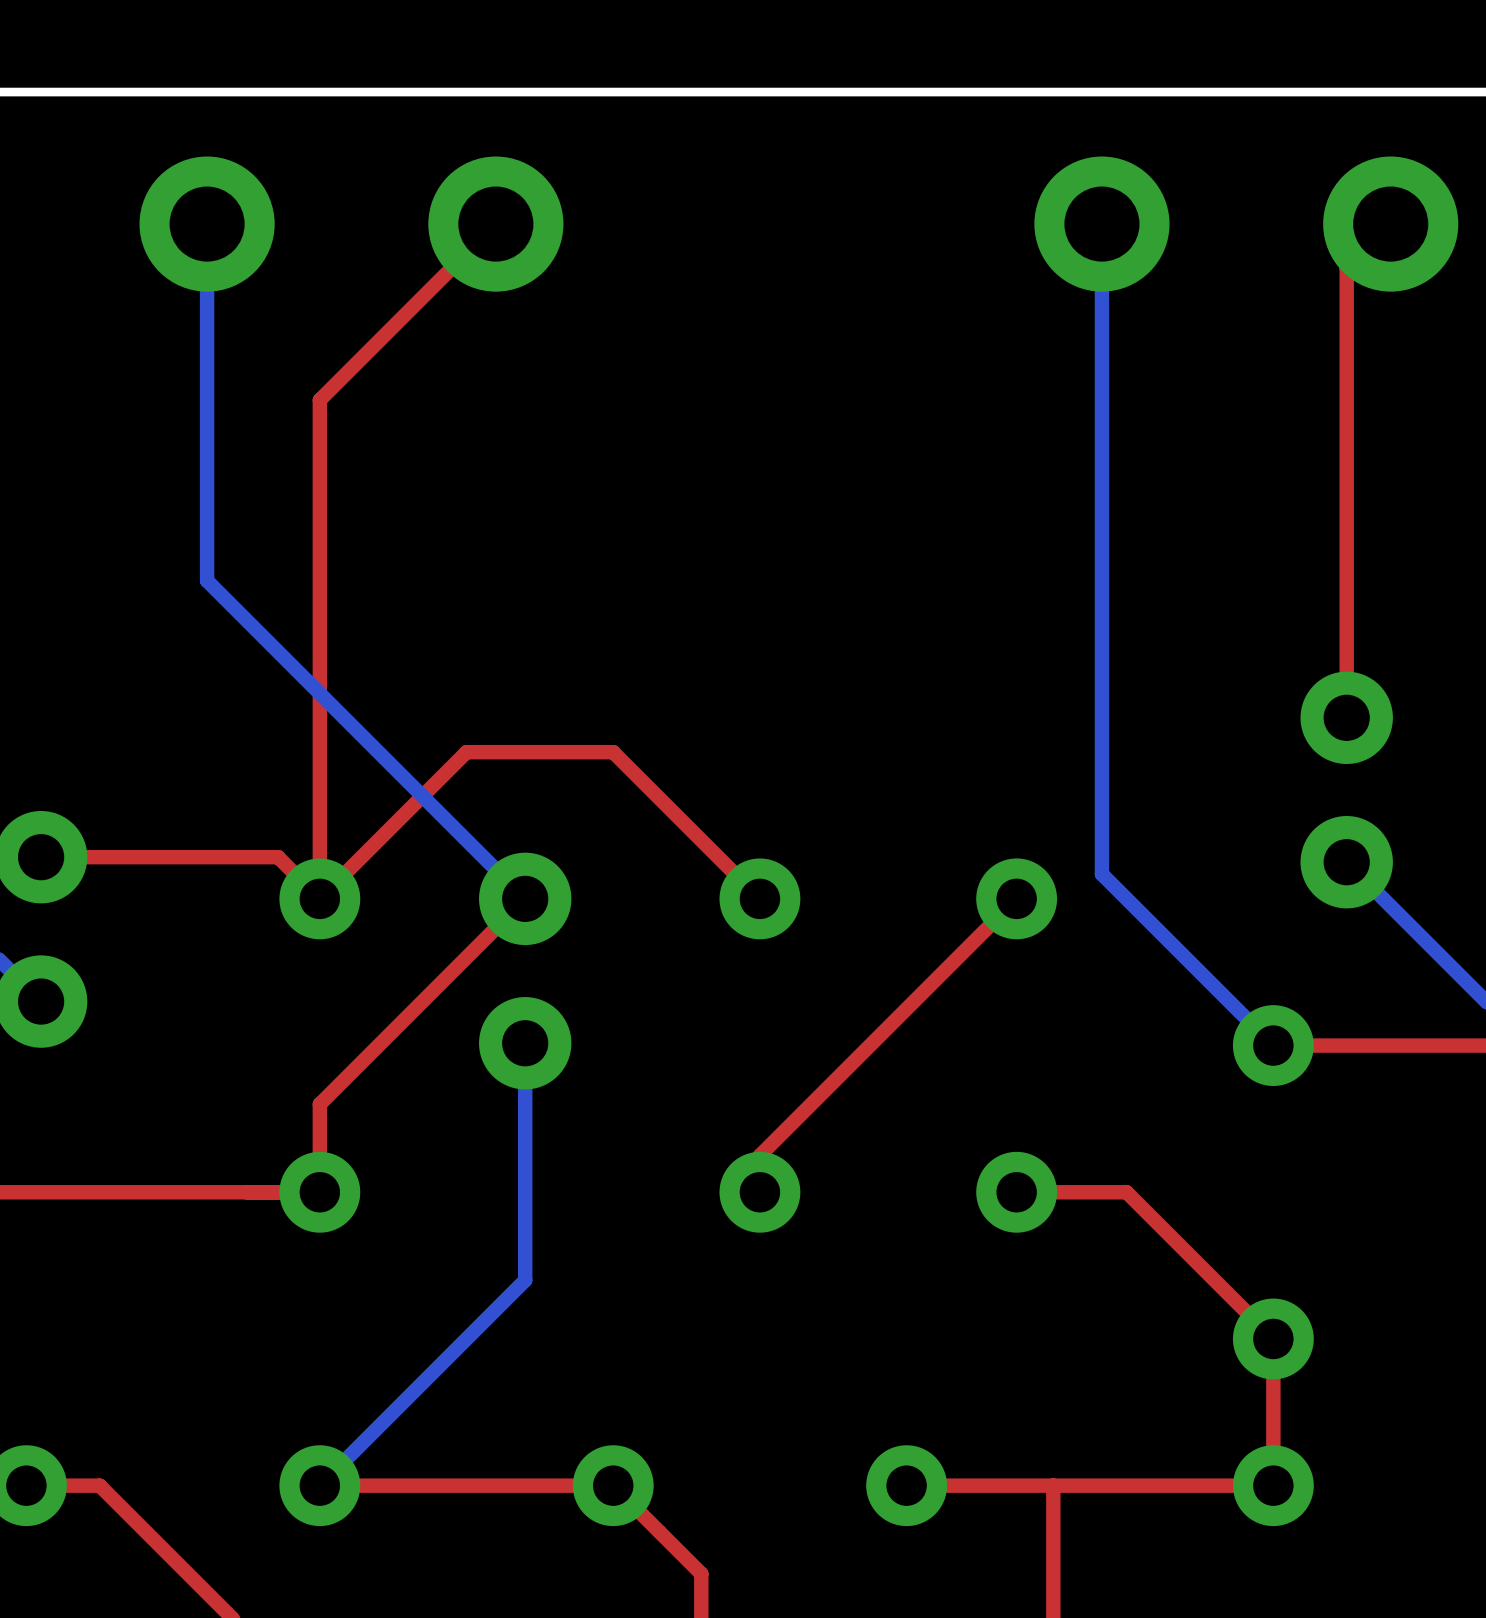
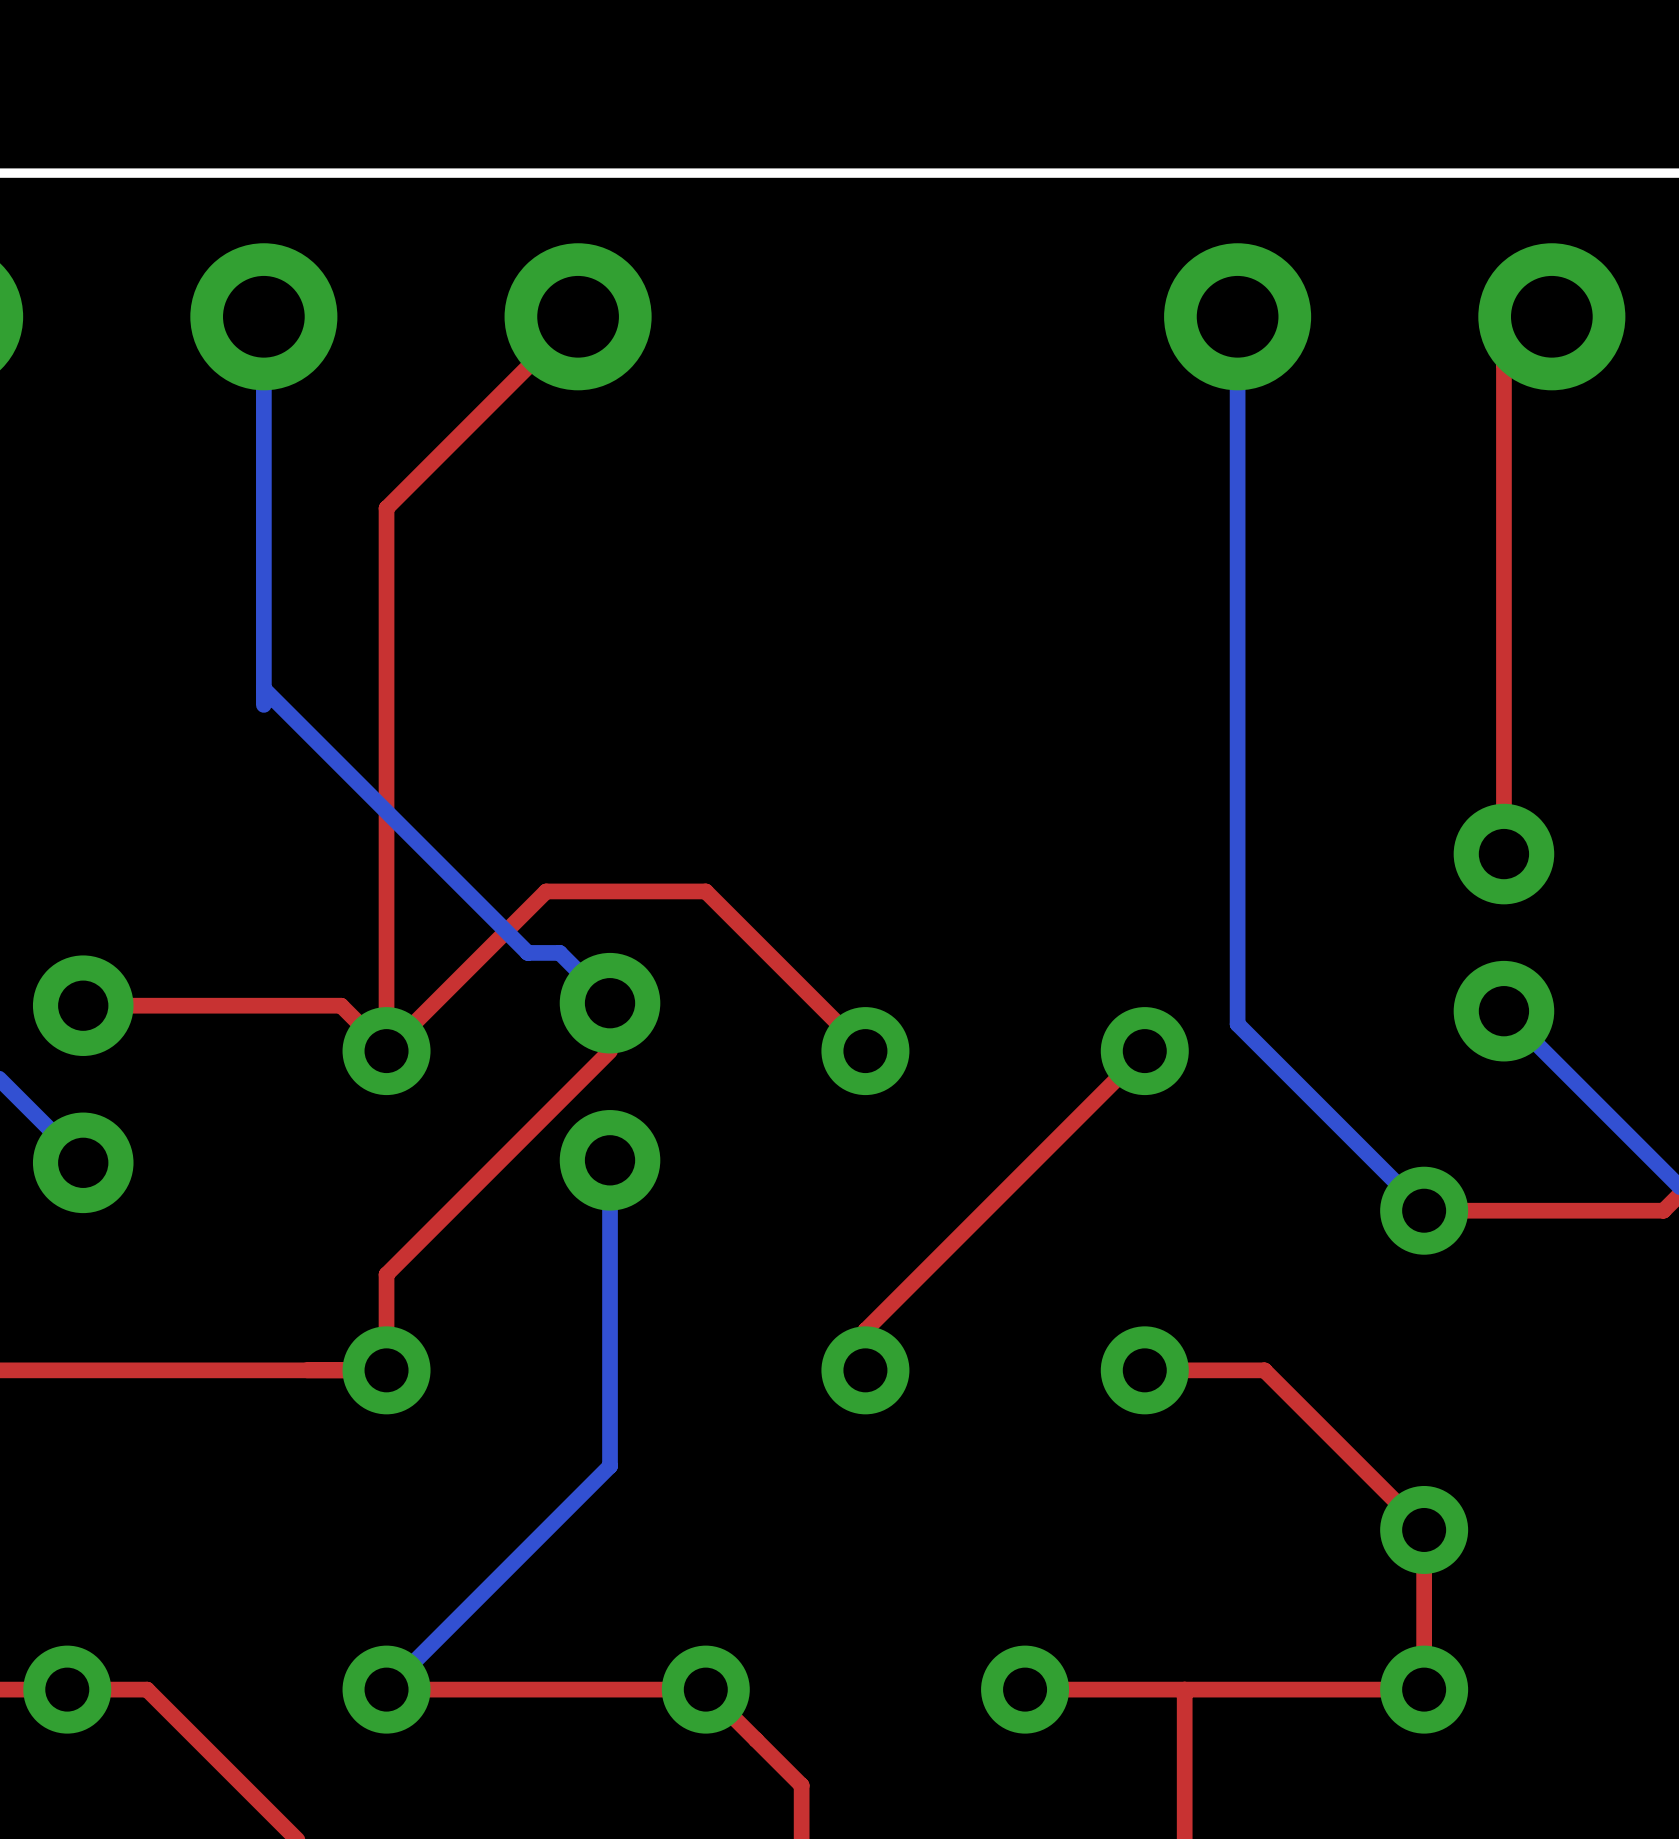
bottom track: none -> (263, 688) (527, 952) (559, 952) (610, 1003)
bottom track: (207, 580) (525, 898) -> none
part position: (525, 971) -> (610, 1081)

